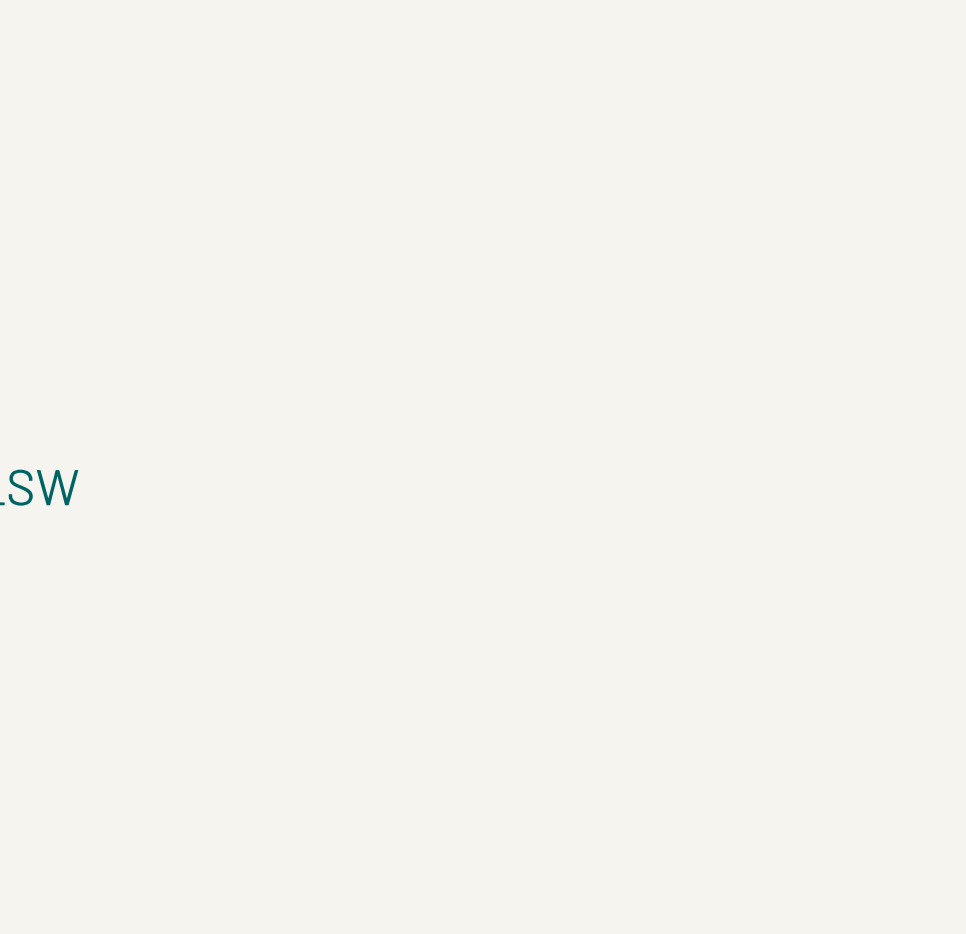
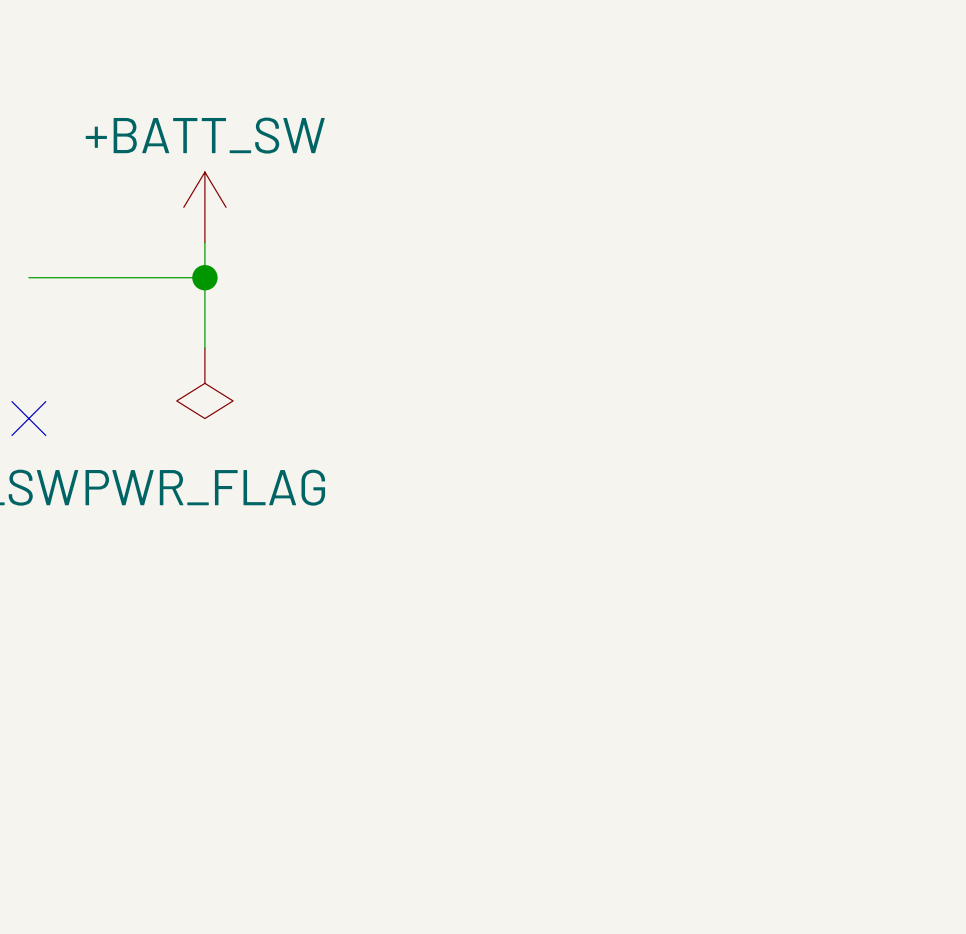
power symbol: none -> +BATT_SW (204, 207)
wire: none -> (204, 242) (204, 348)
wire: none -> (28, 277) (204, 277)
junction: none -> (204, 277)
power symbol: none -> PWR_FLAG (204, 383)
no-connect mark: none -> (28, 418)

